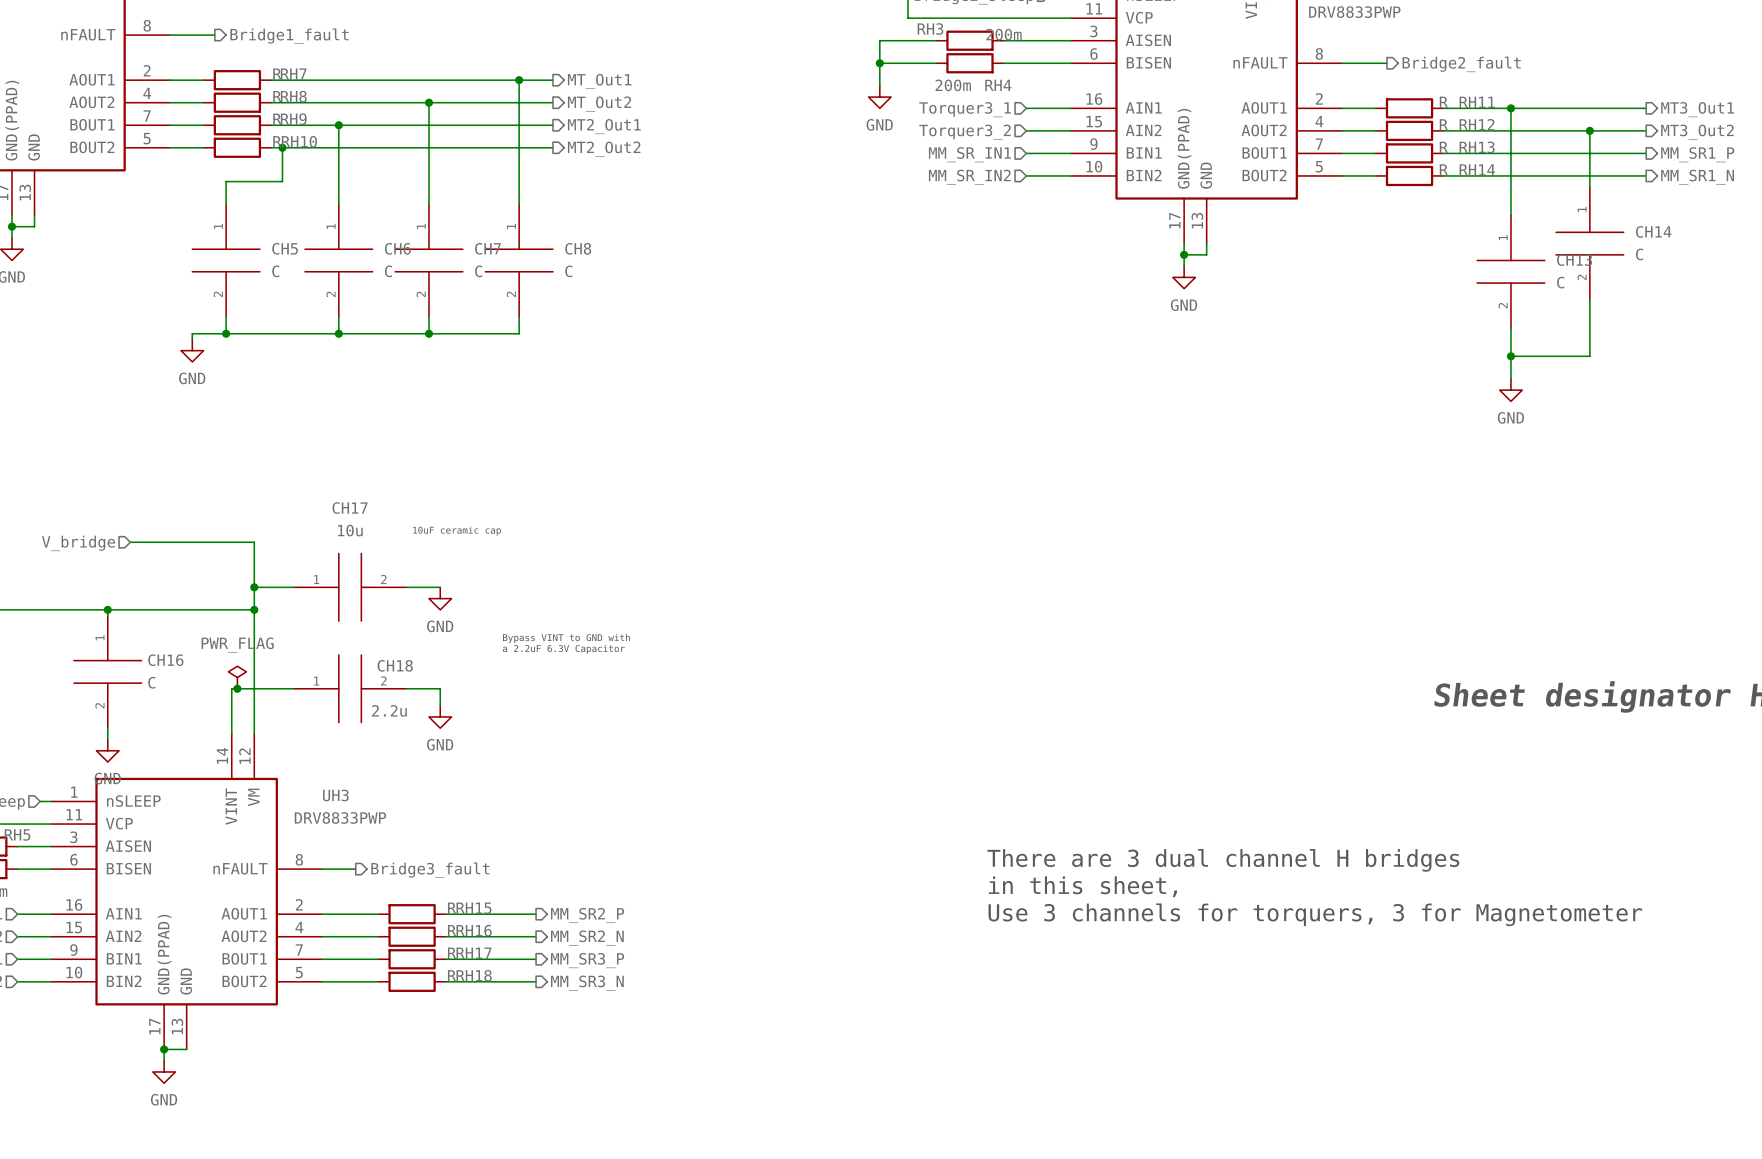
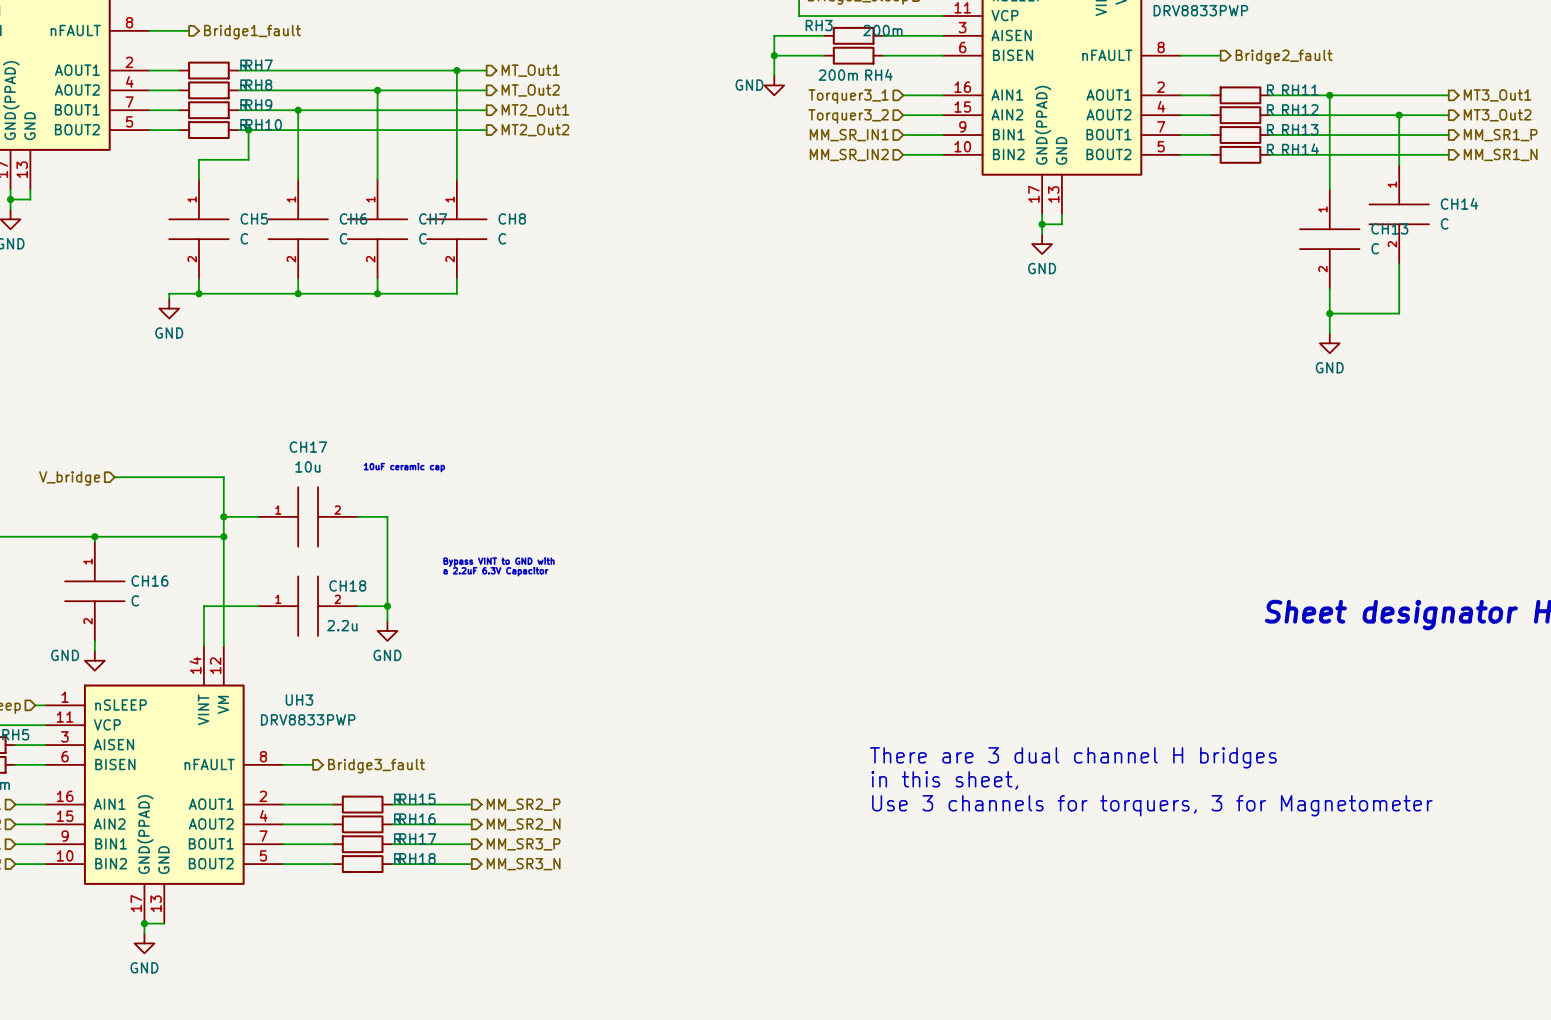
power symbol text position: GND (879, 124) -> GND (749, 85)
wire: none -> (387, 516) (387, 606)
power symbol: GND (440, 598) -> none
power symbol: PWR_FLAG (237, 677) -> none
junction: (237, 688) -> none
junction: none -> (387, 606)
power symbol text position: GND (107, 778) -> GND (65, 655)

